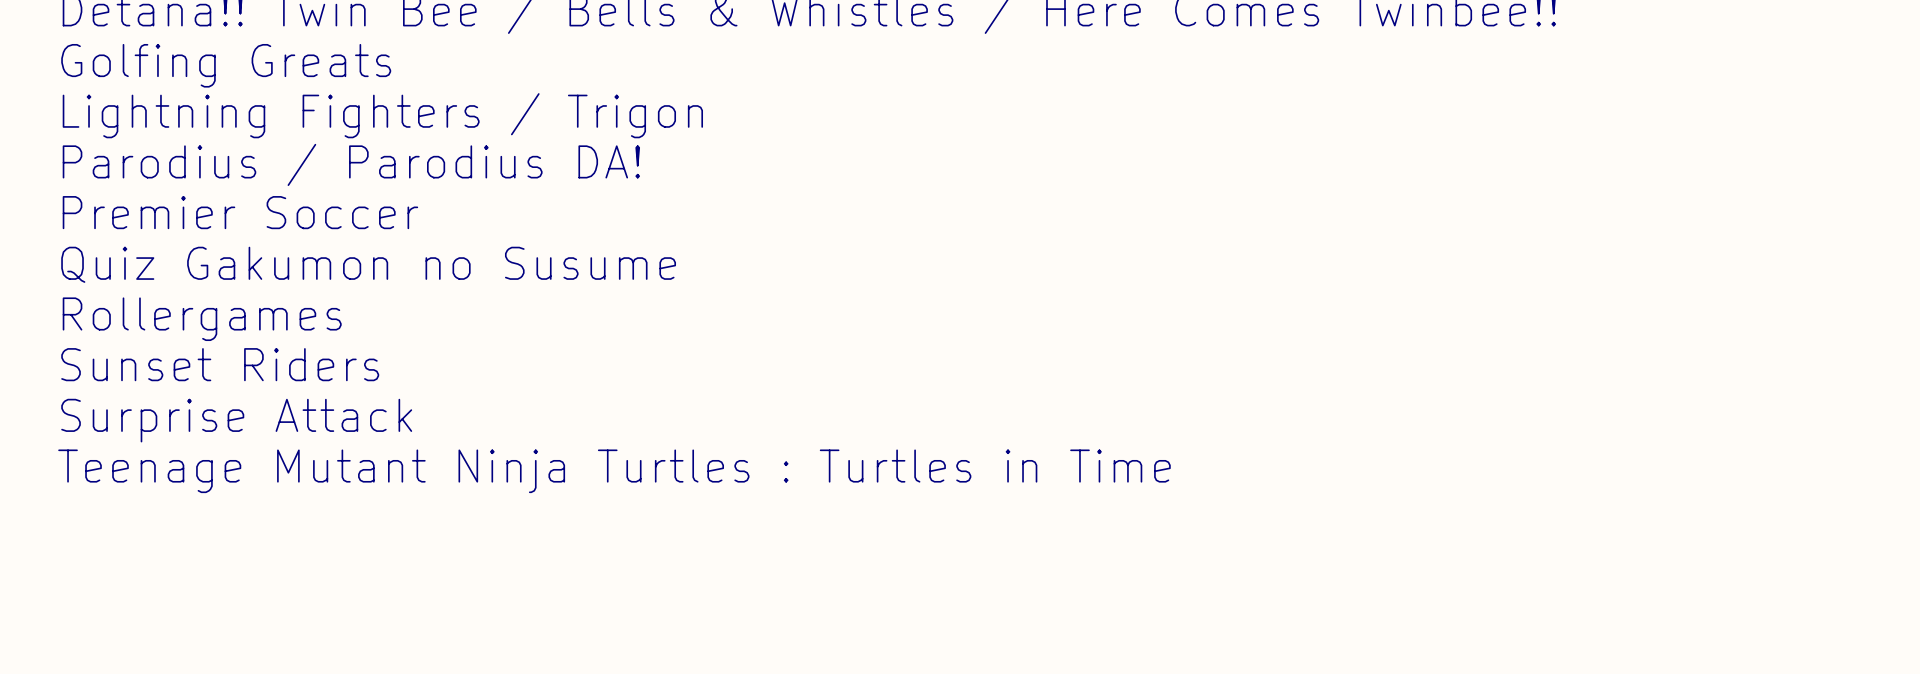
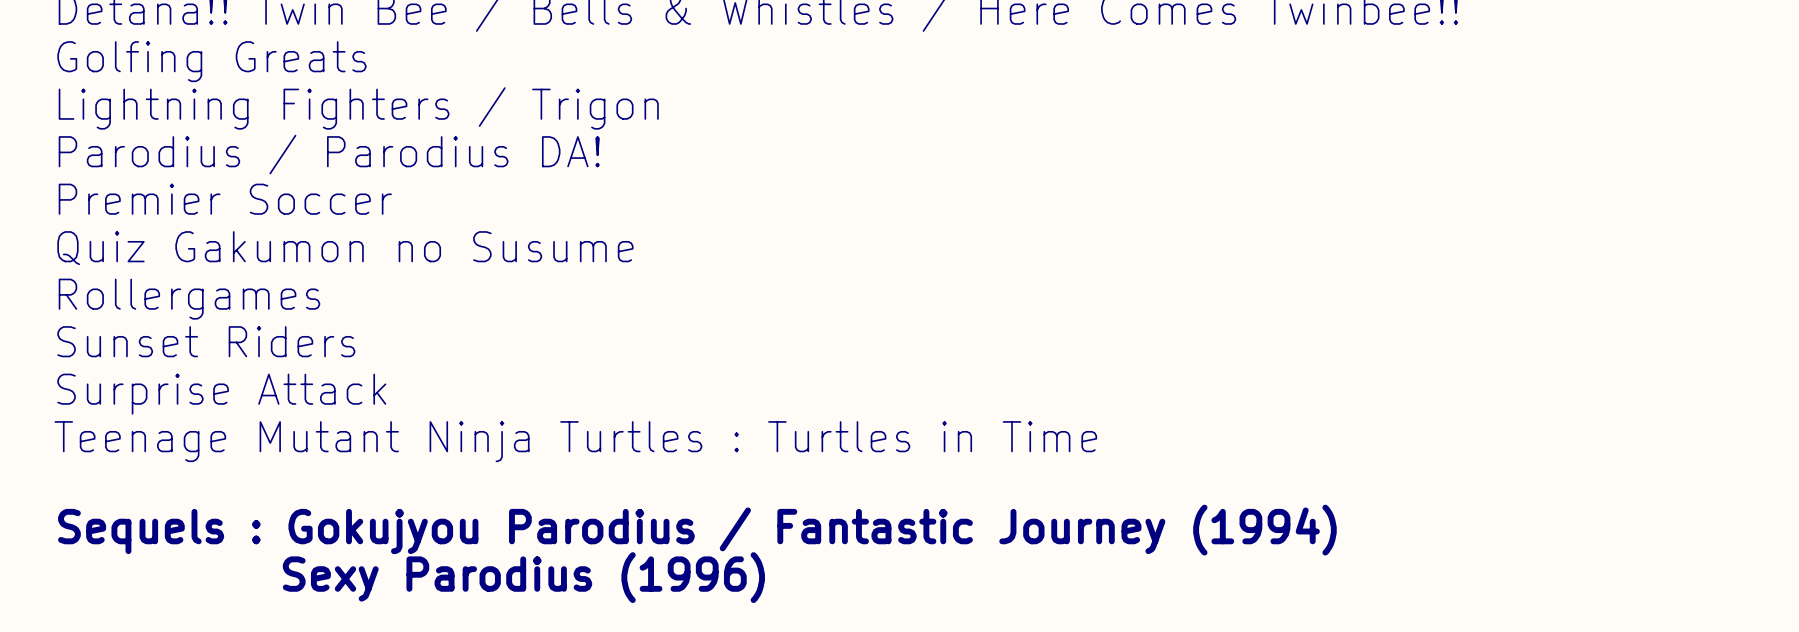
text: none -> Sequels : Gokujyou Parodius / Fantastic Journey (1994) (697, 530)
text: none -> Sexy Parodius (1996) (523, 577)

